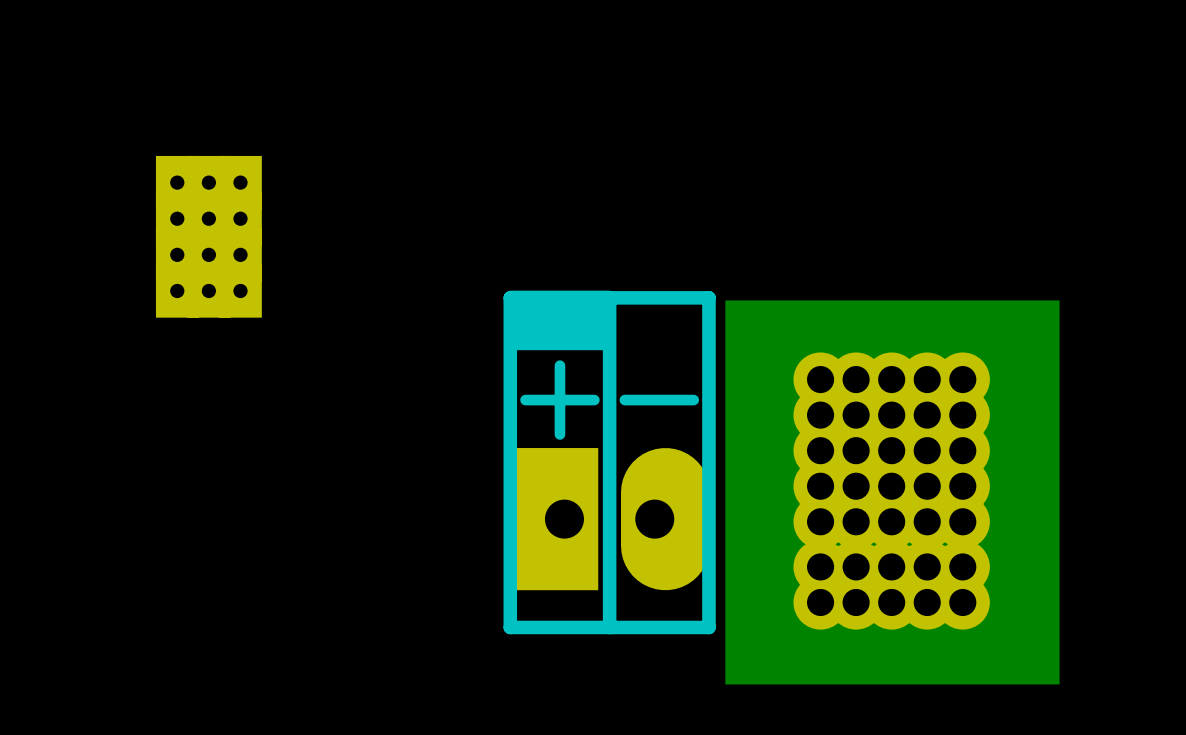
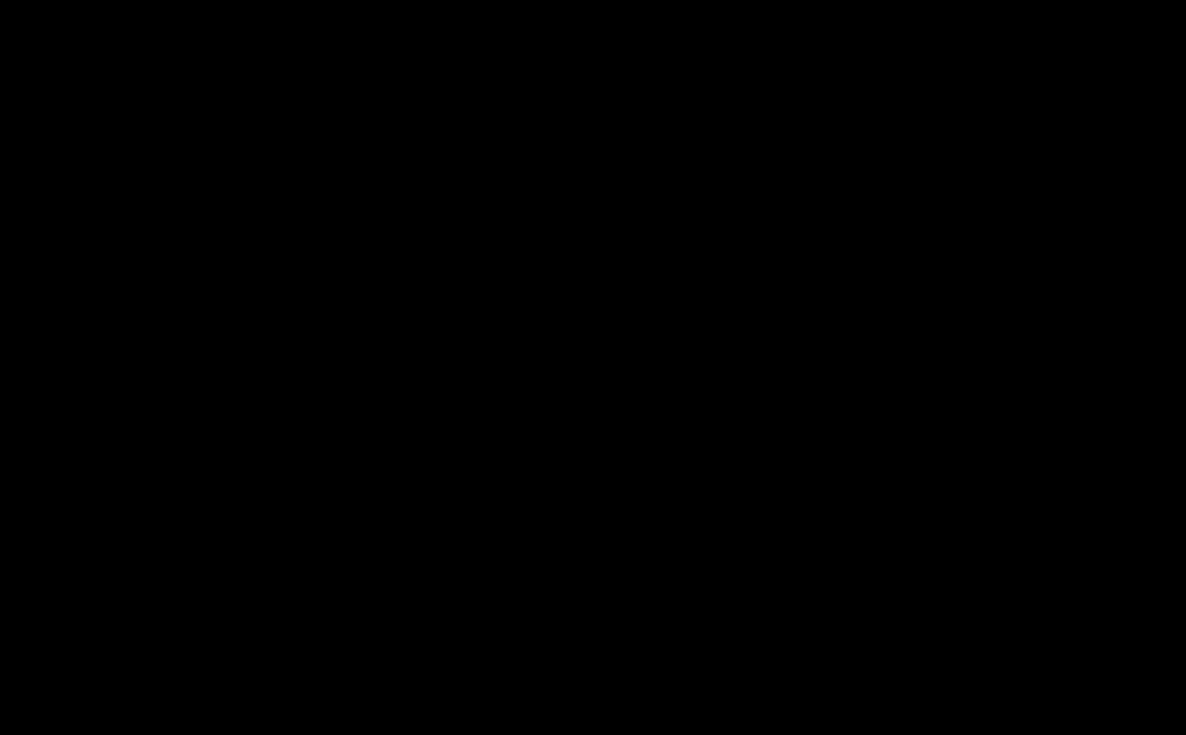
part: (208, 236) -> none
part: (609, 462) -> none
part: (892, 492) -> none

